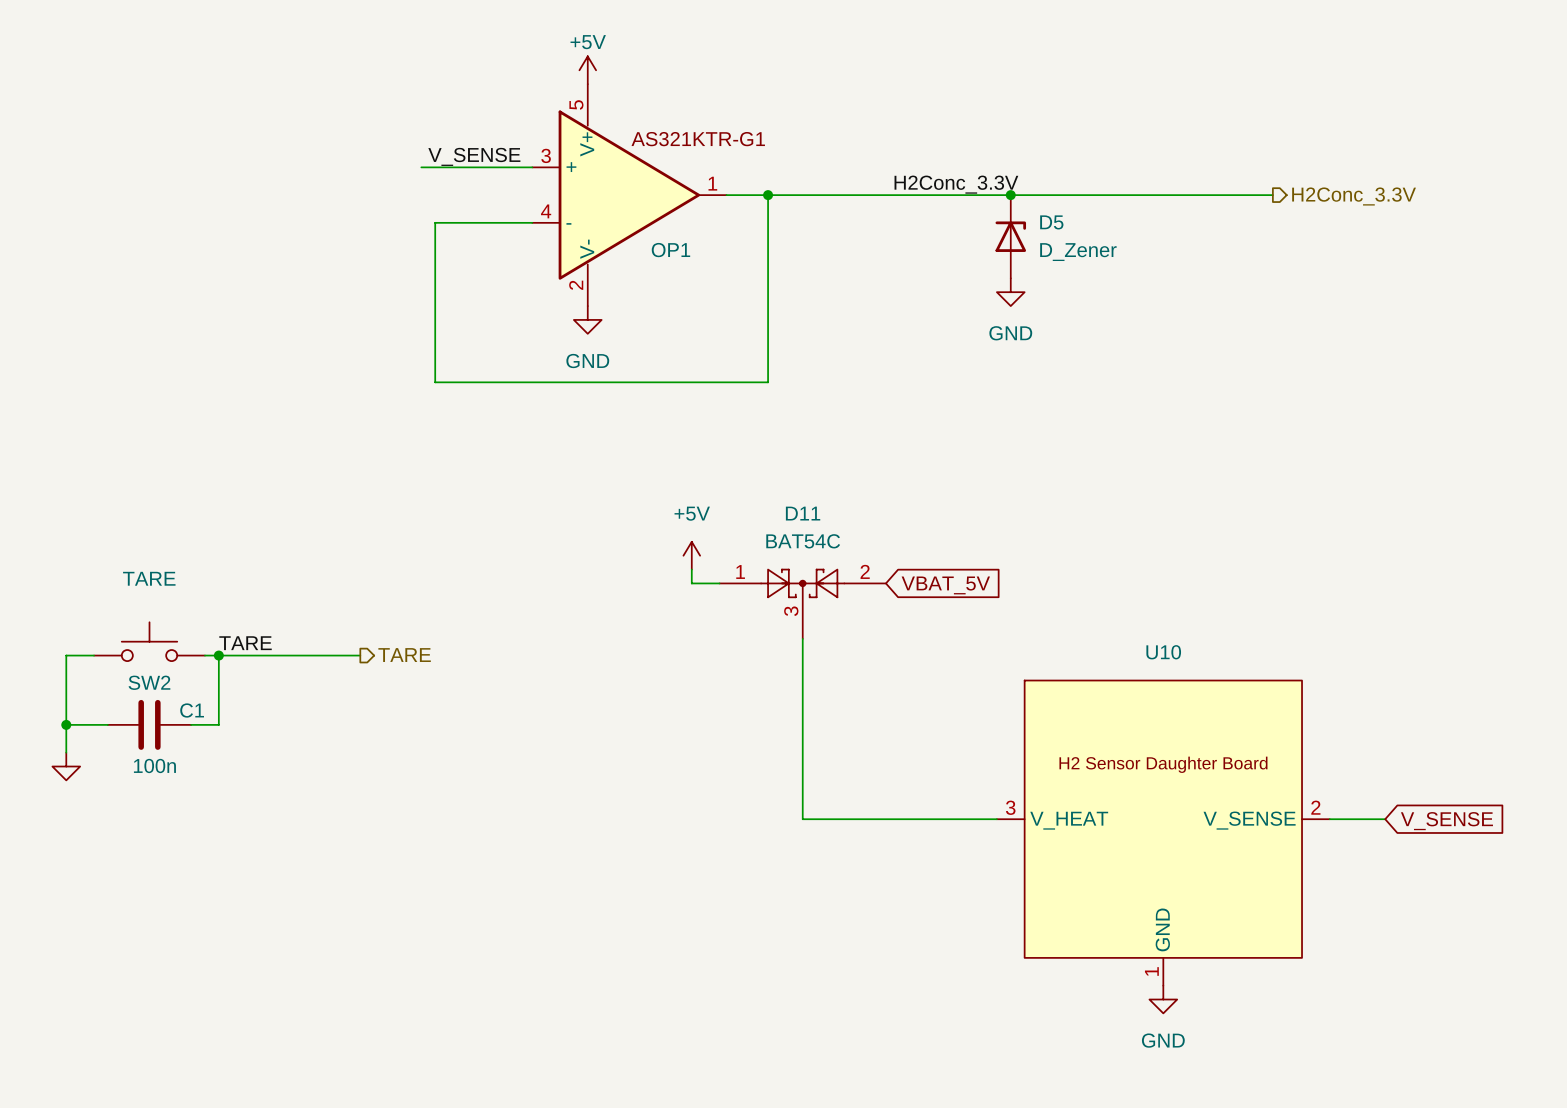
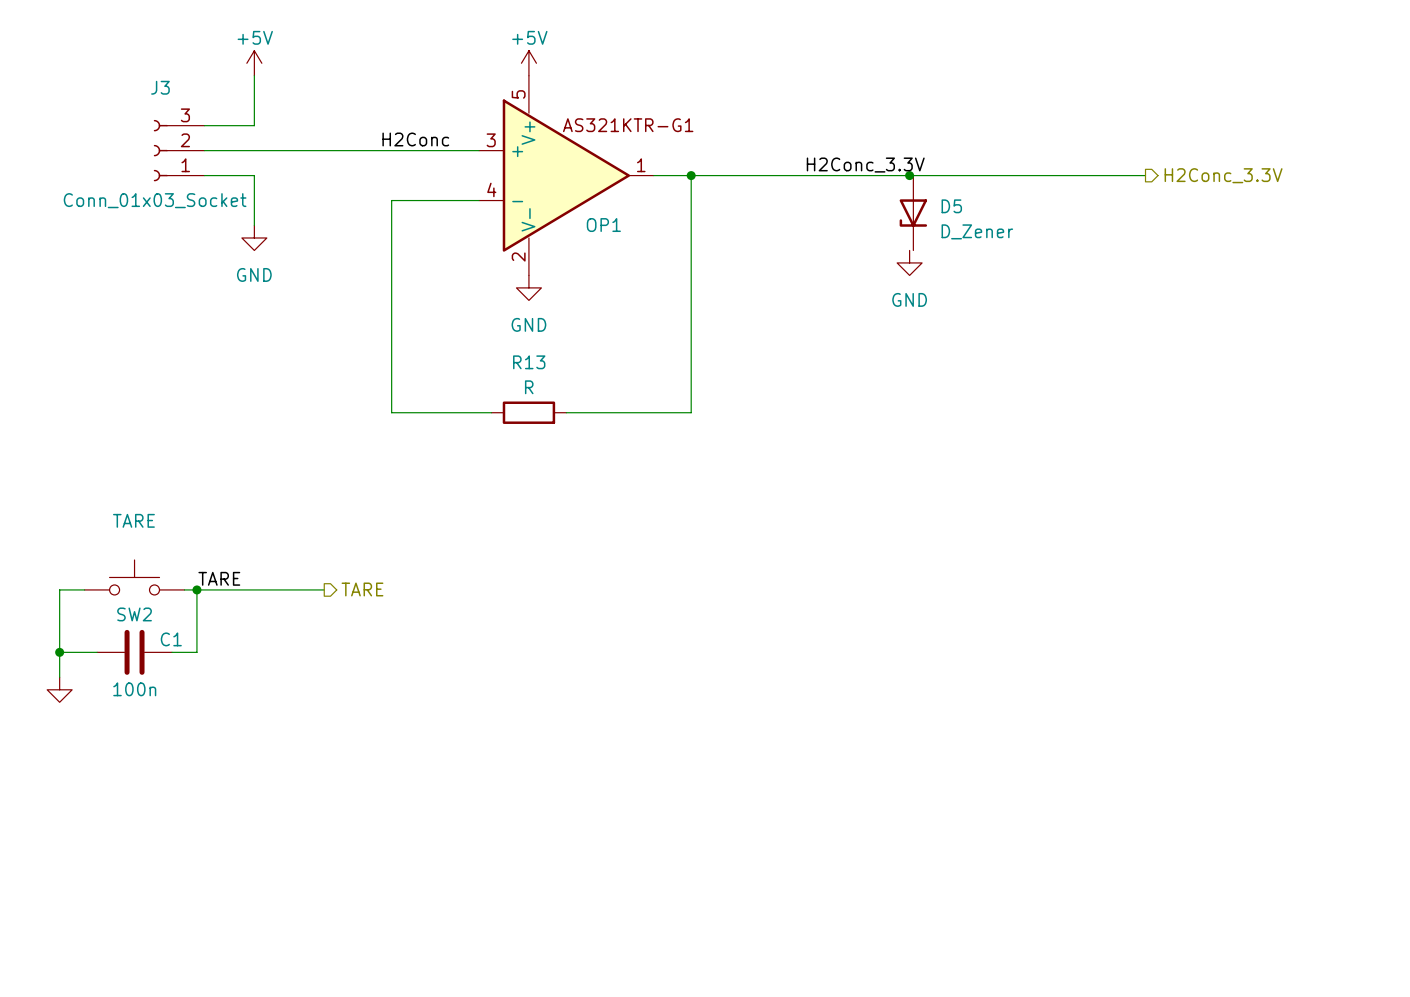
power symbol: none -> +5V (254, 63)
wire: none -> (254, 75) (254, 125) (204, 125)
label: V_SENSE (474, 156) -> H2Conc (415, 139)
J3: none -> Conn_01x03_Socket (179, 150)
wire: none -> (204, 150) (379, 150)
wire: none -> (204, 175) (254, 175) (254, 225)
D5 rotation: 0° (1010, 236) -> 180° (913, 213)
power symbol: none -> GND (254, 237)
wire: (435, 382) (768, 382) -> (566, 412) (691, 412) (691, 344)
wire: none -> (391, 344) (391, 412) (491, 412)
R13: none -> R (528, 412)
power symbol: +5V (691, 555) -> none
wire: (691, 569) (691, 583) (719, 583) -> none
global label: VBAT_5V (945, 585) -> none
D11: BAT54C (802, 604) -> none
wire: (802, 638) (802, 819) (996, 819) -> none
wire: (1329, 819) (1385, 819) -> none
global label: V_SENSE (1446, 821) -> none
U10: (1163, 833) -> none
power symbol: GND (1163, 999) -> none

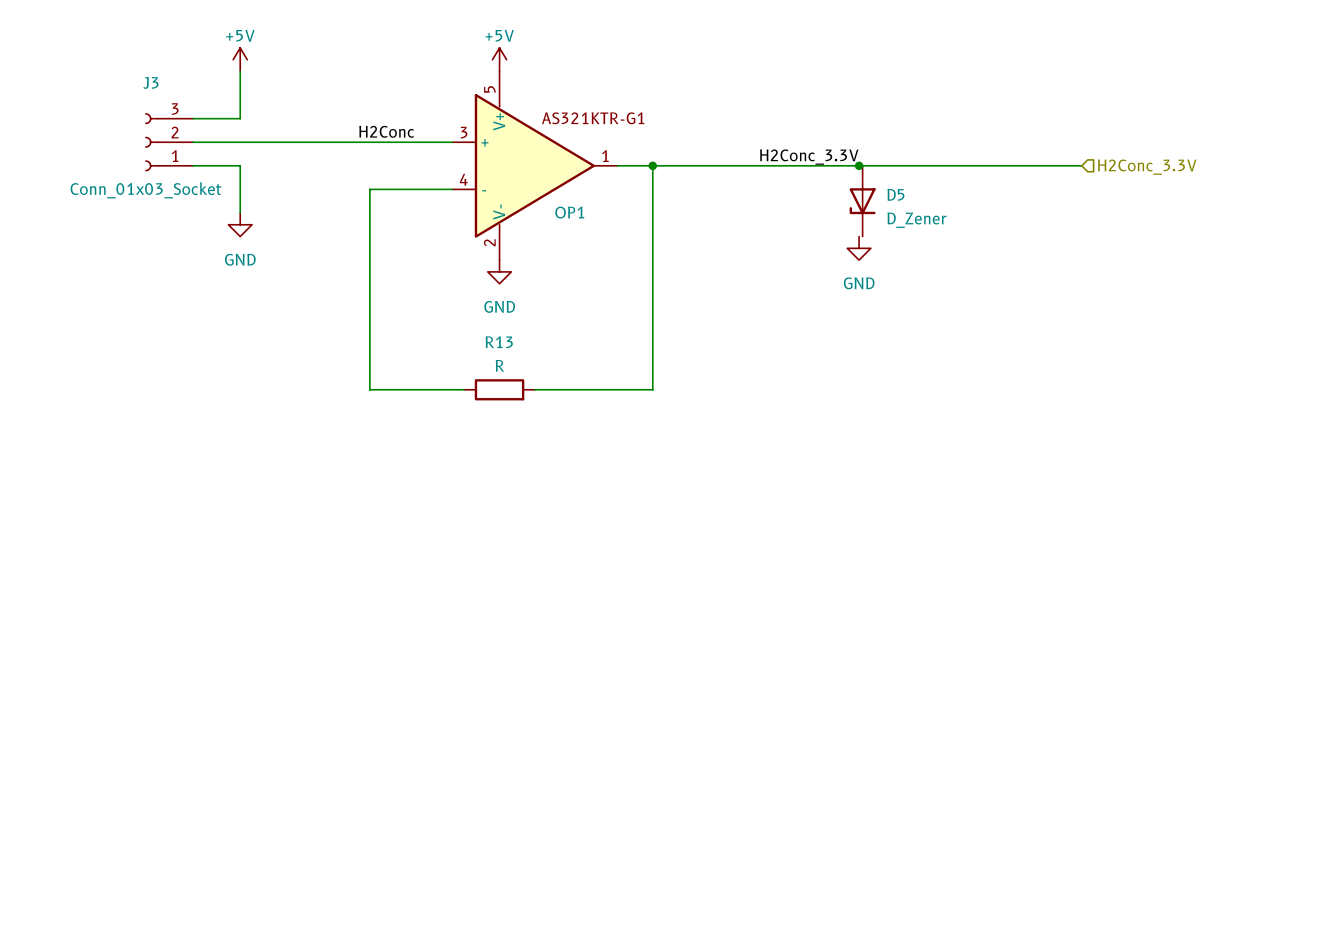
hierarchical label shape: output (1223, 175) -> input (1147, 167)
SW2: TARE (134, 577) -> none
label: TARE (219, 578) -> none
wire: (84, 589) (59, 589) (59, 677) -> none
wire: (184, 589) (324, 589) -> none
wire: (196, 589) (196, 652) (171, 652) -> none
junction: (196, 589) -> none
hierarchical label: TARE (362, 589) -> none
wire: (59, 652) (97, 652) -> none
junction: (59, 652) -> none
C1: 100n (134, 652) -> none
power symbol: (59, 689) -> none

